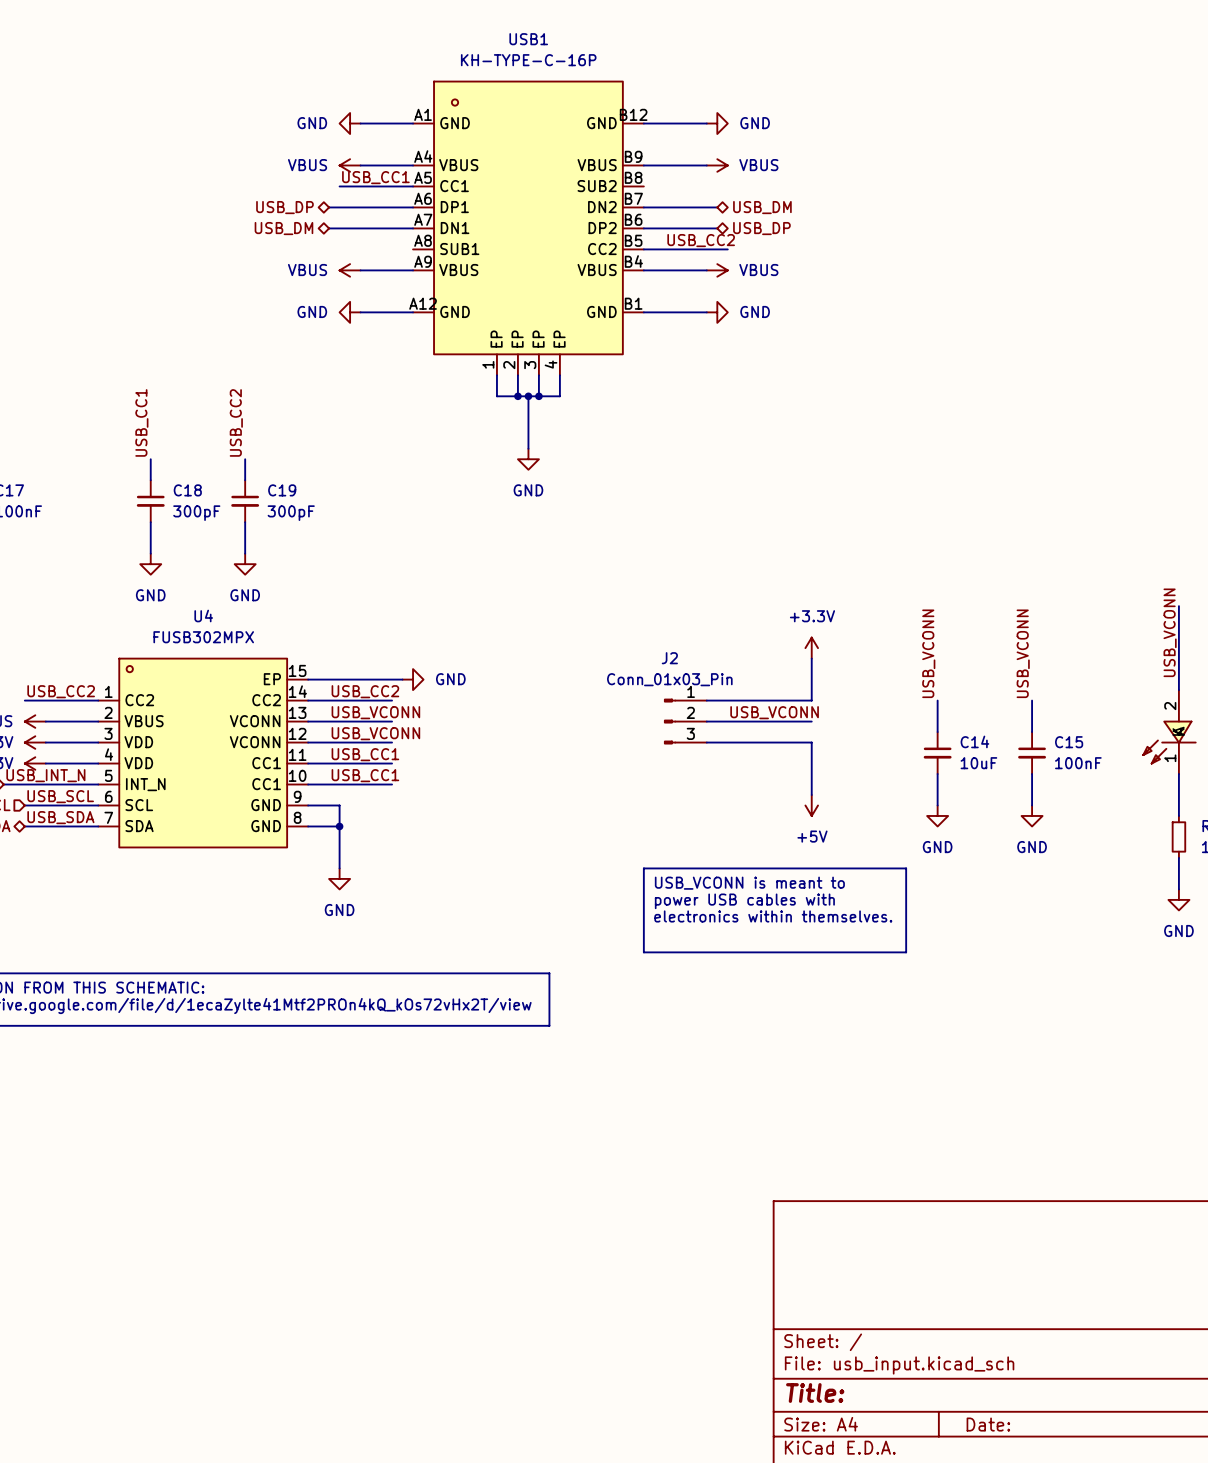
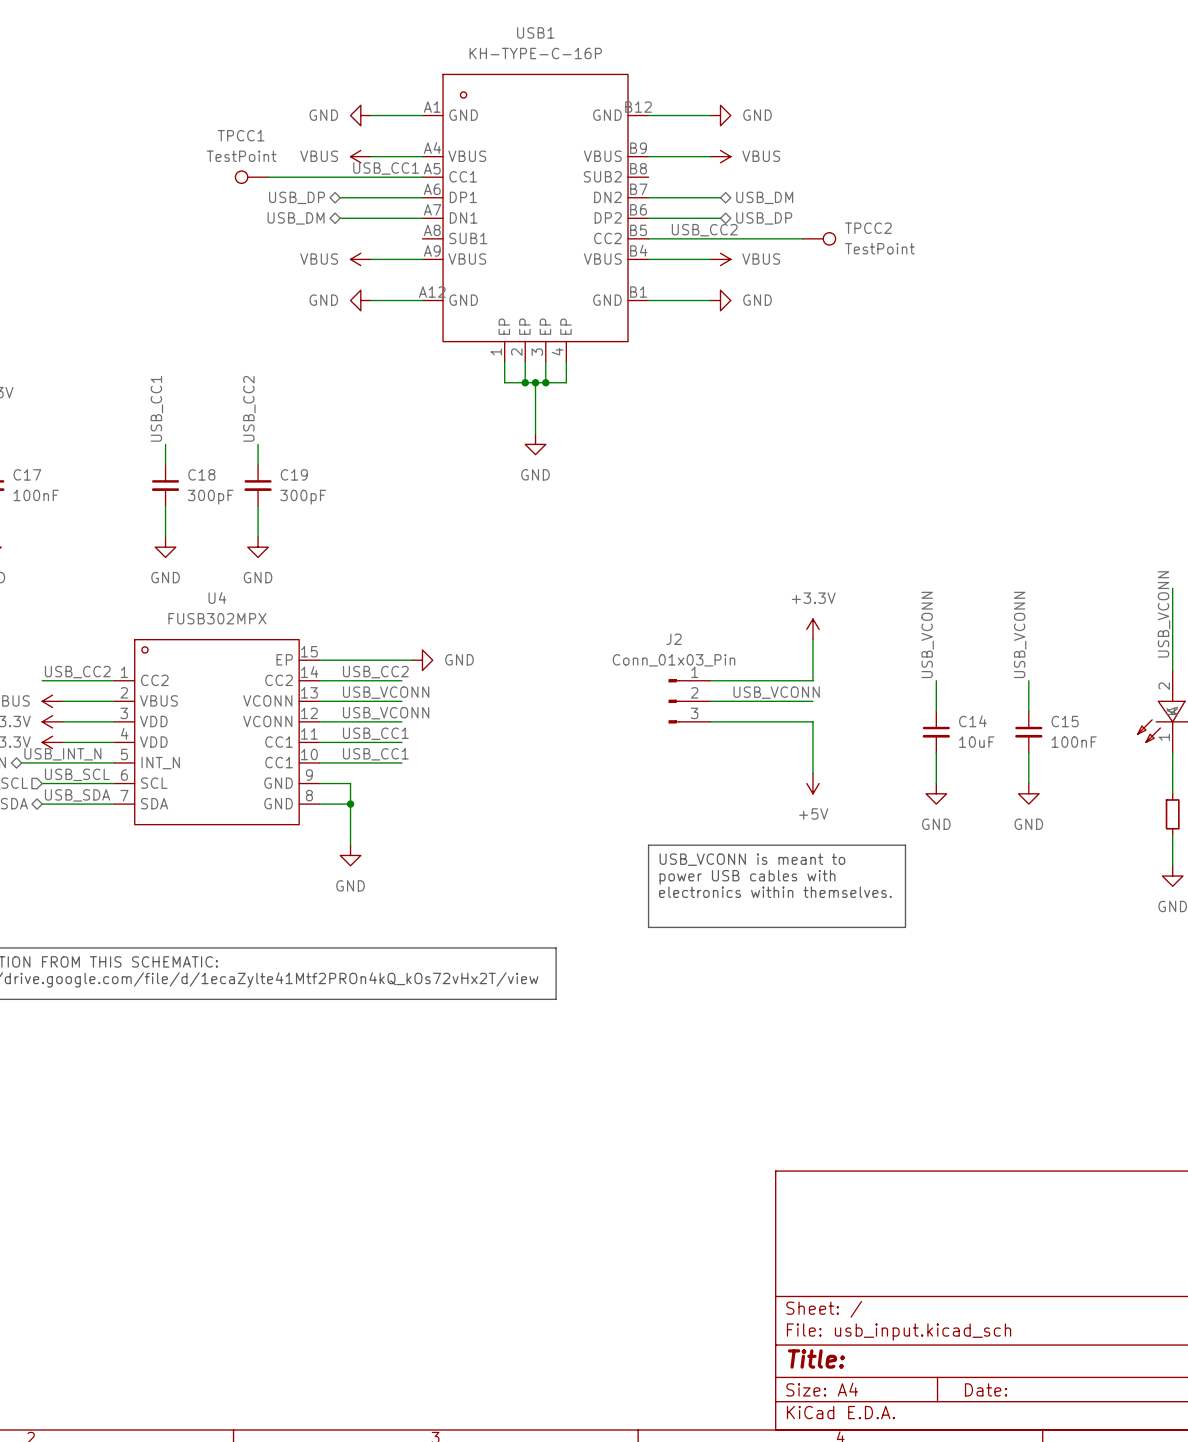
TPCC1: none -> TestPoint (251, 177)
wire: none -> (268, 177) (350, 177)
wire: none -> (730, 238) (802, 238)
TPCC2: none -> TestPoint (819, 238)

